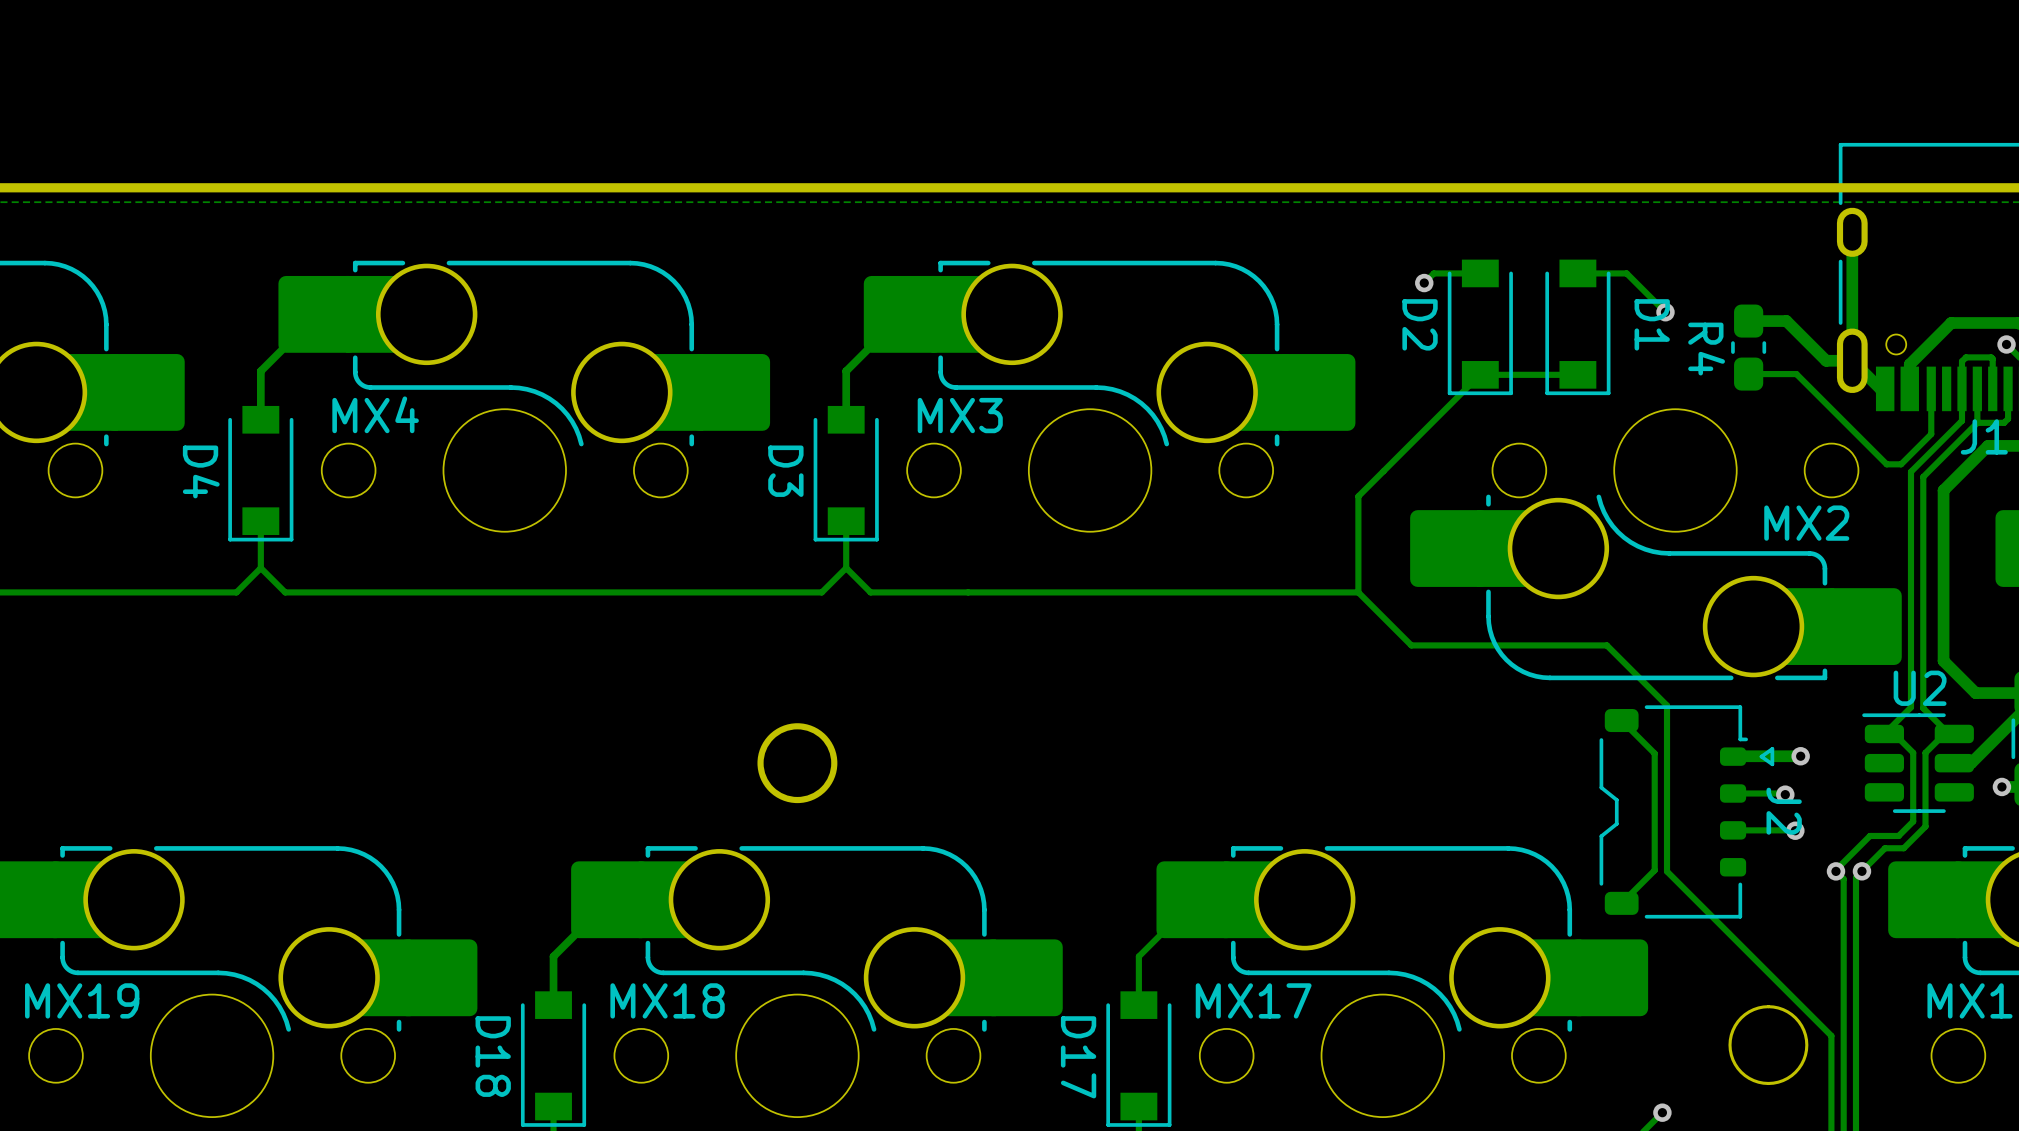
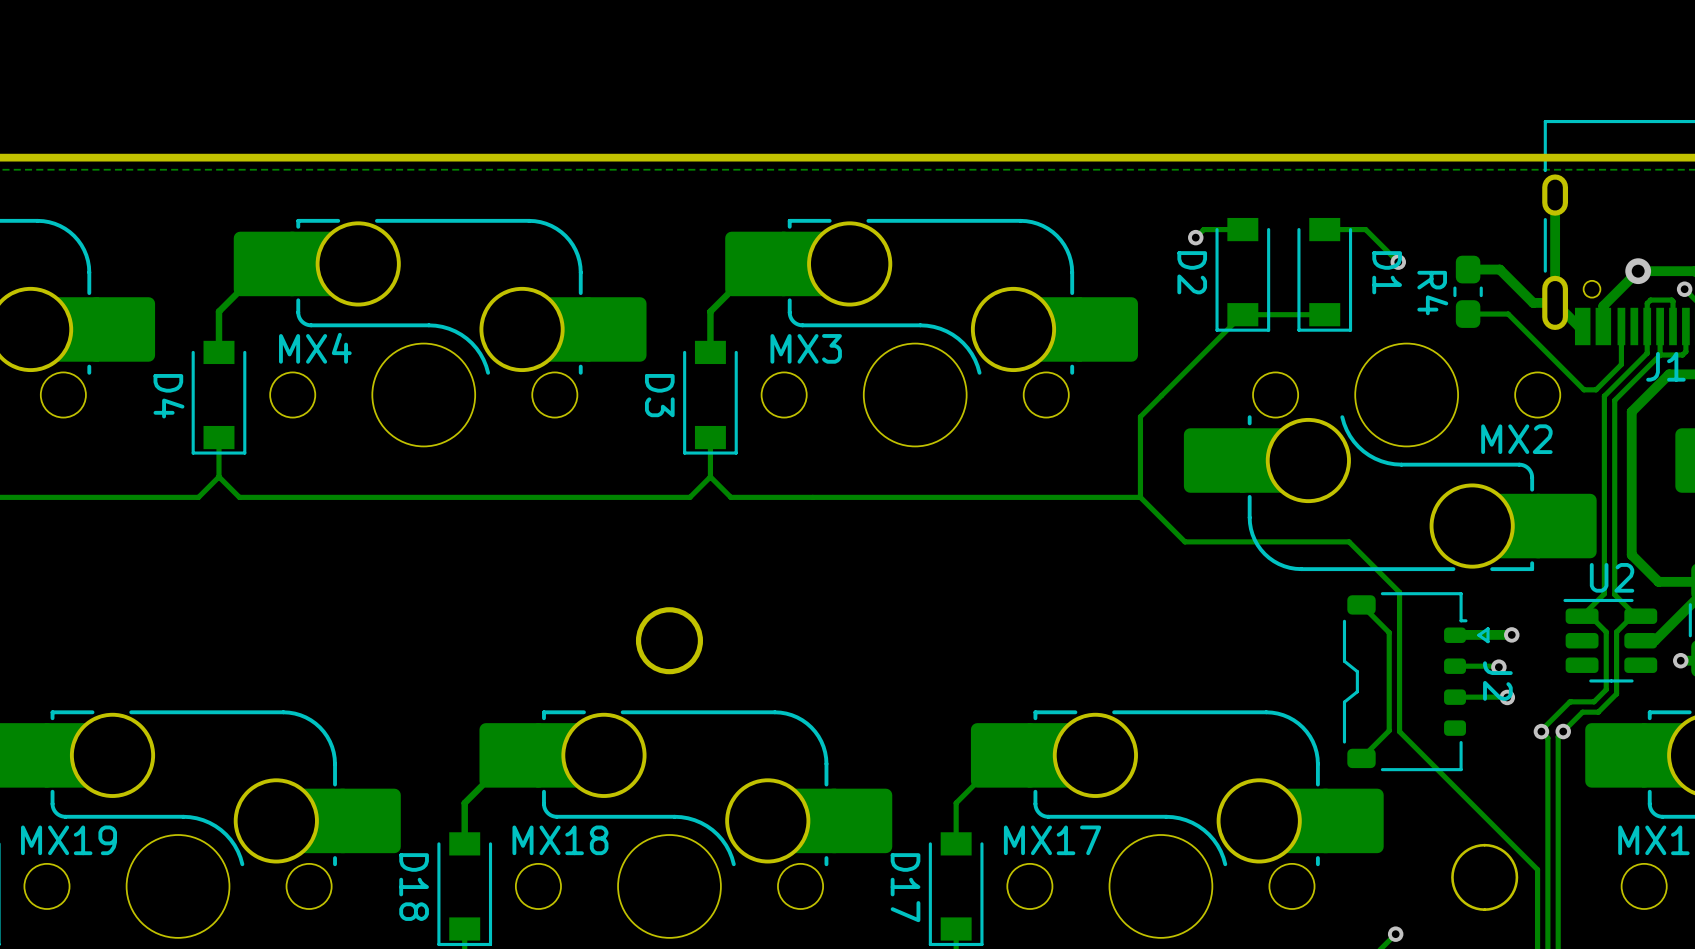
via: none -> (1638, 271)

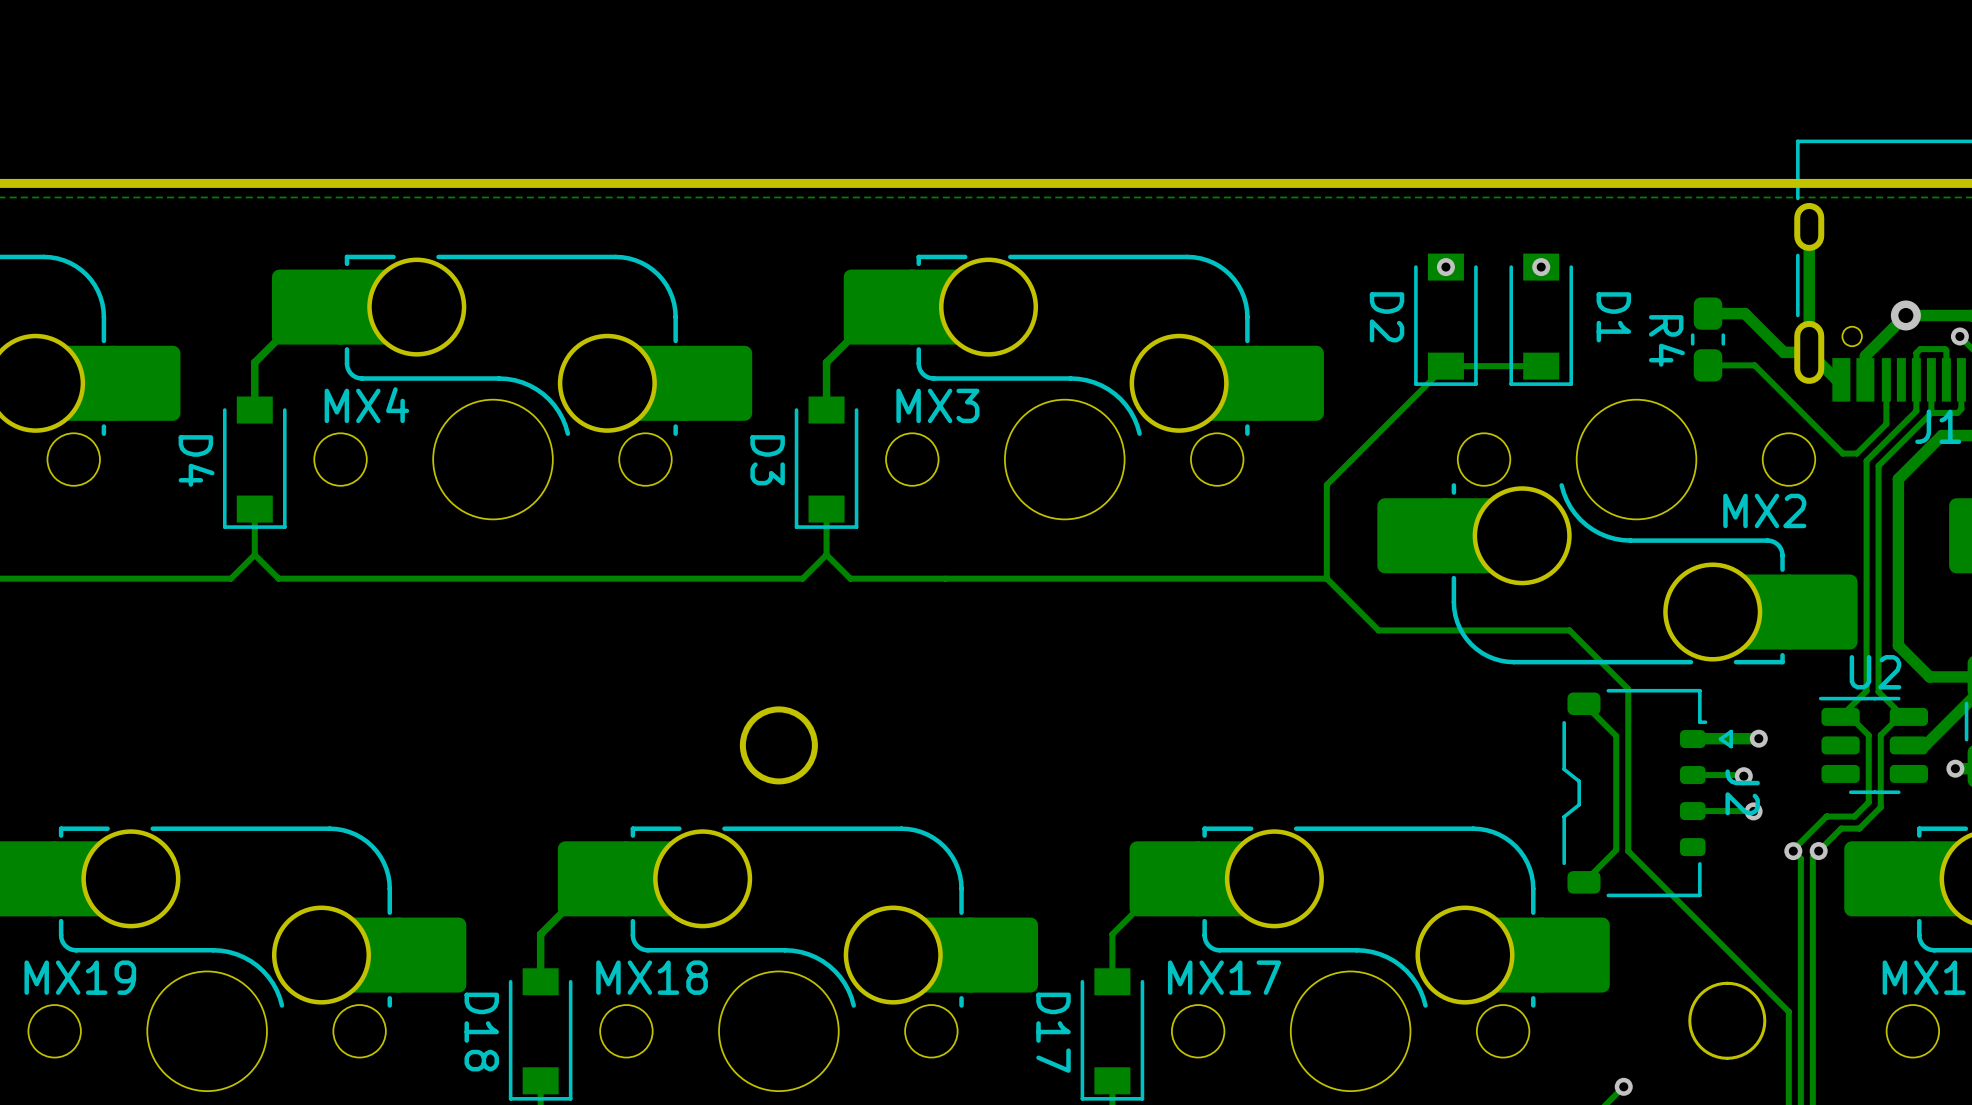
track: (1242, 229) (1203, 229) (1195, 237) -> none
track: (1324, 229) (1365, 229) (1398, 262) -> none
via: none -> (1541, 267)
via position: (1195, 237) -> (1445, 267)
via: (1398, 262) -> none

